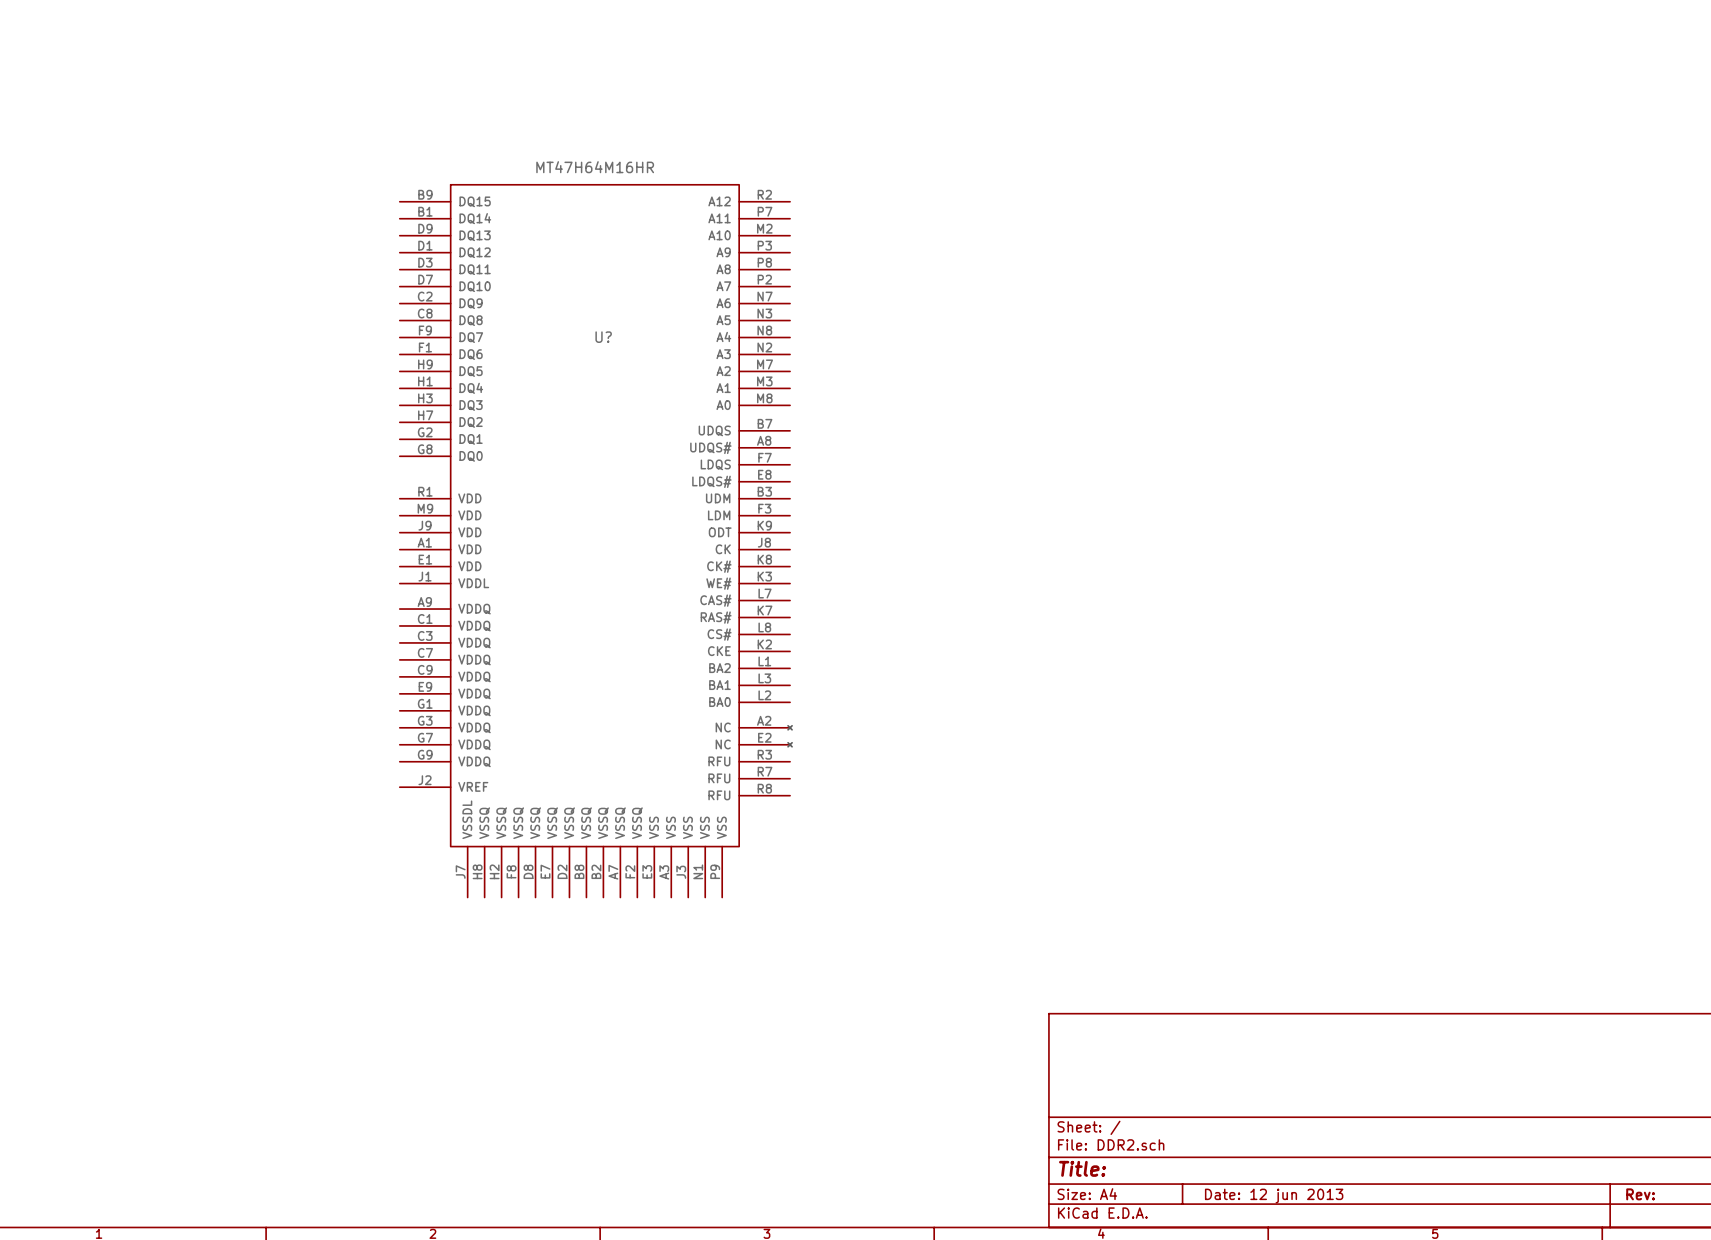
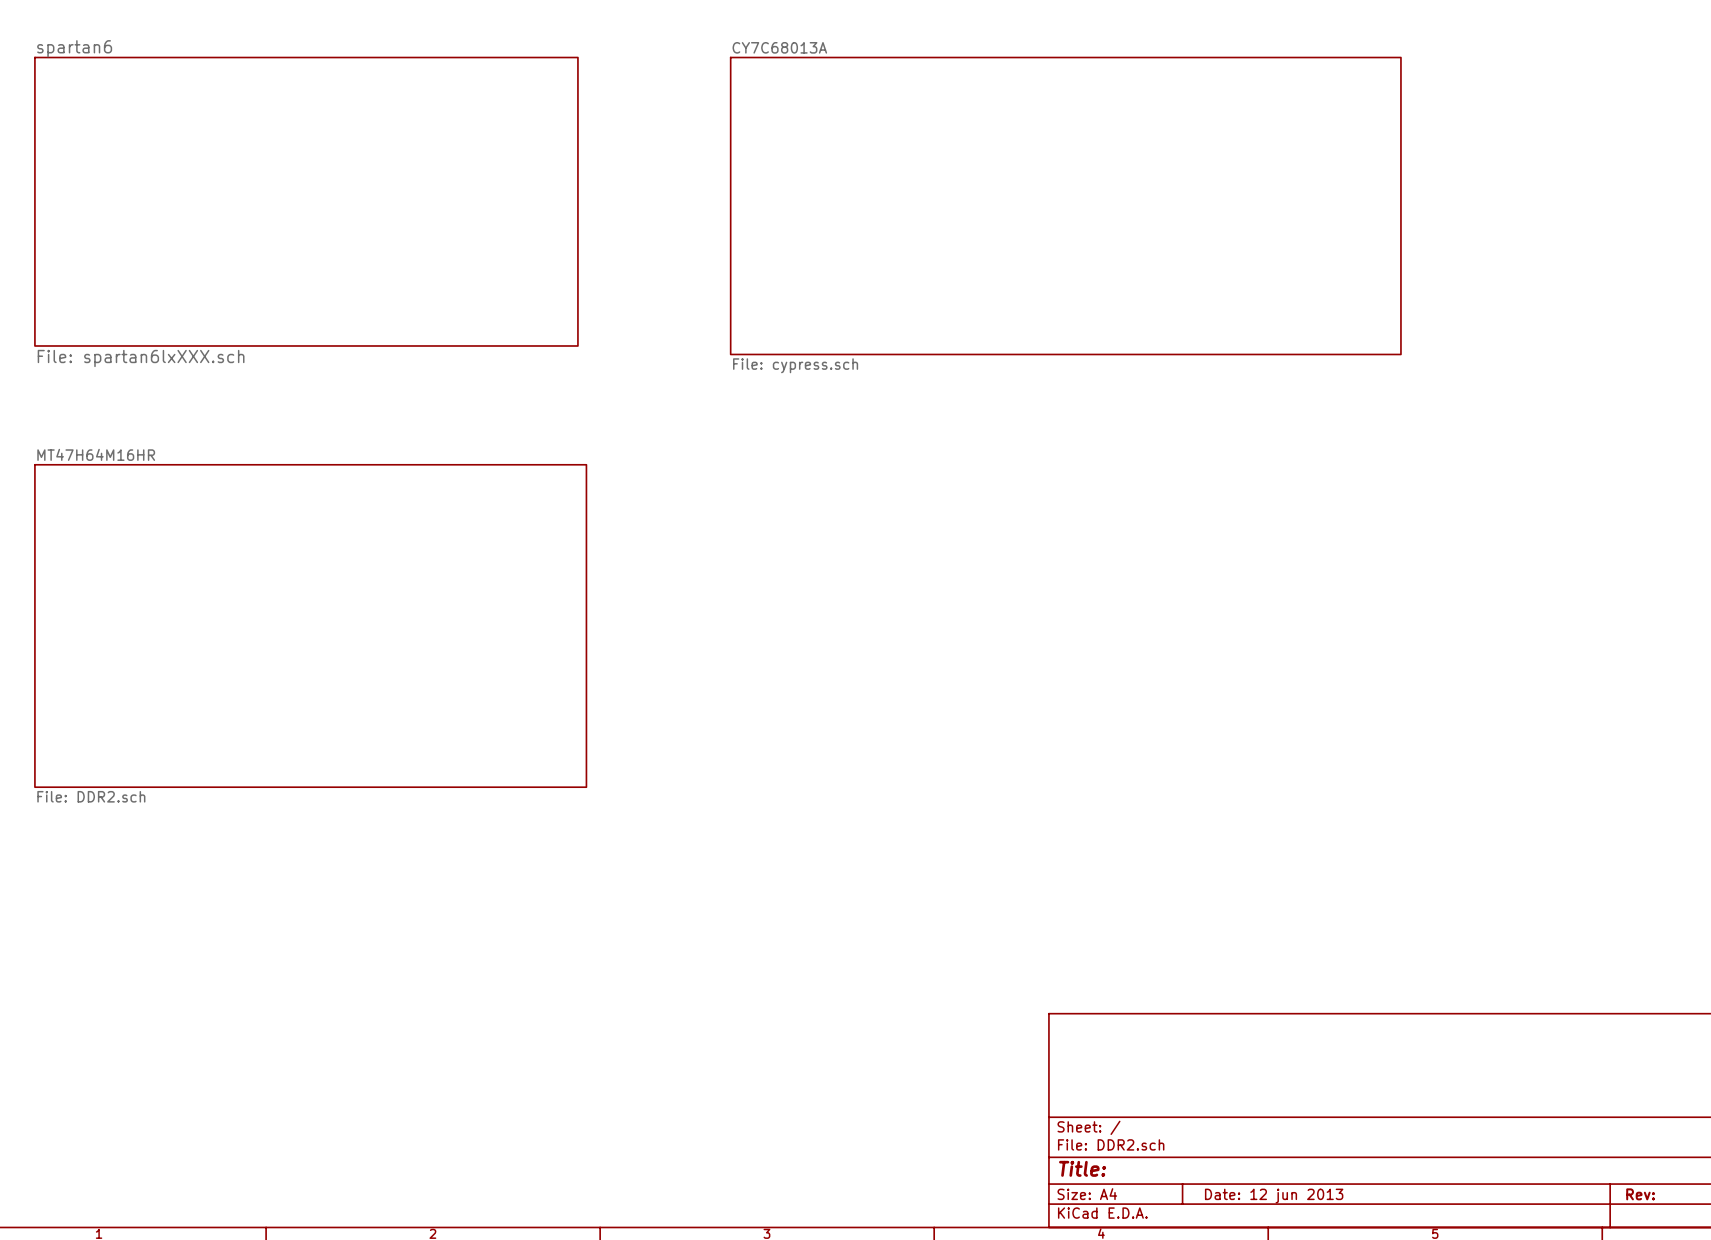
sheet spartan6: none -> File: spartan6lxXXX.sch (306, 201)
sheet CY7C68013A: none -> File: cypress.sch (1065, 205)
U?: MT47H64M16HR (595, 541) -> none
sheet MT47H64M16HR: none -> File: DDR2.sch (310, 625)

